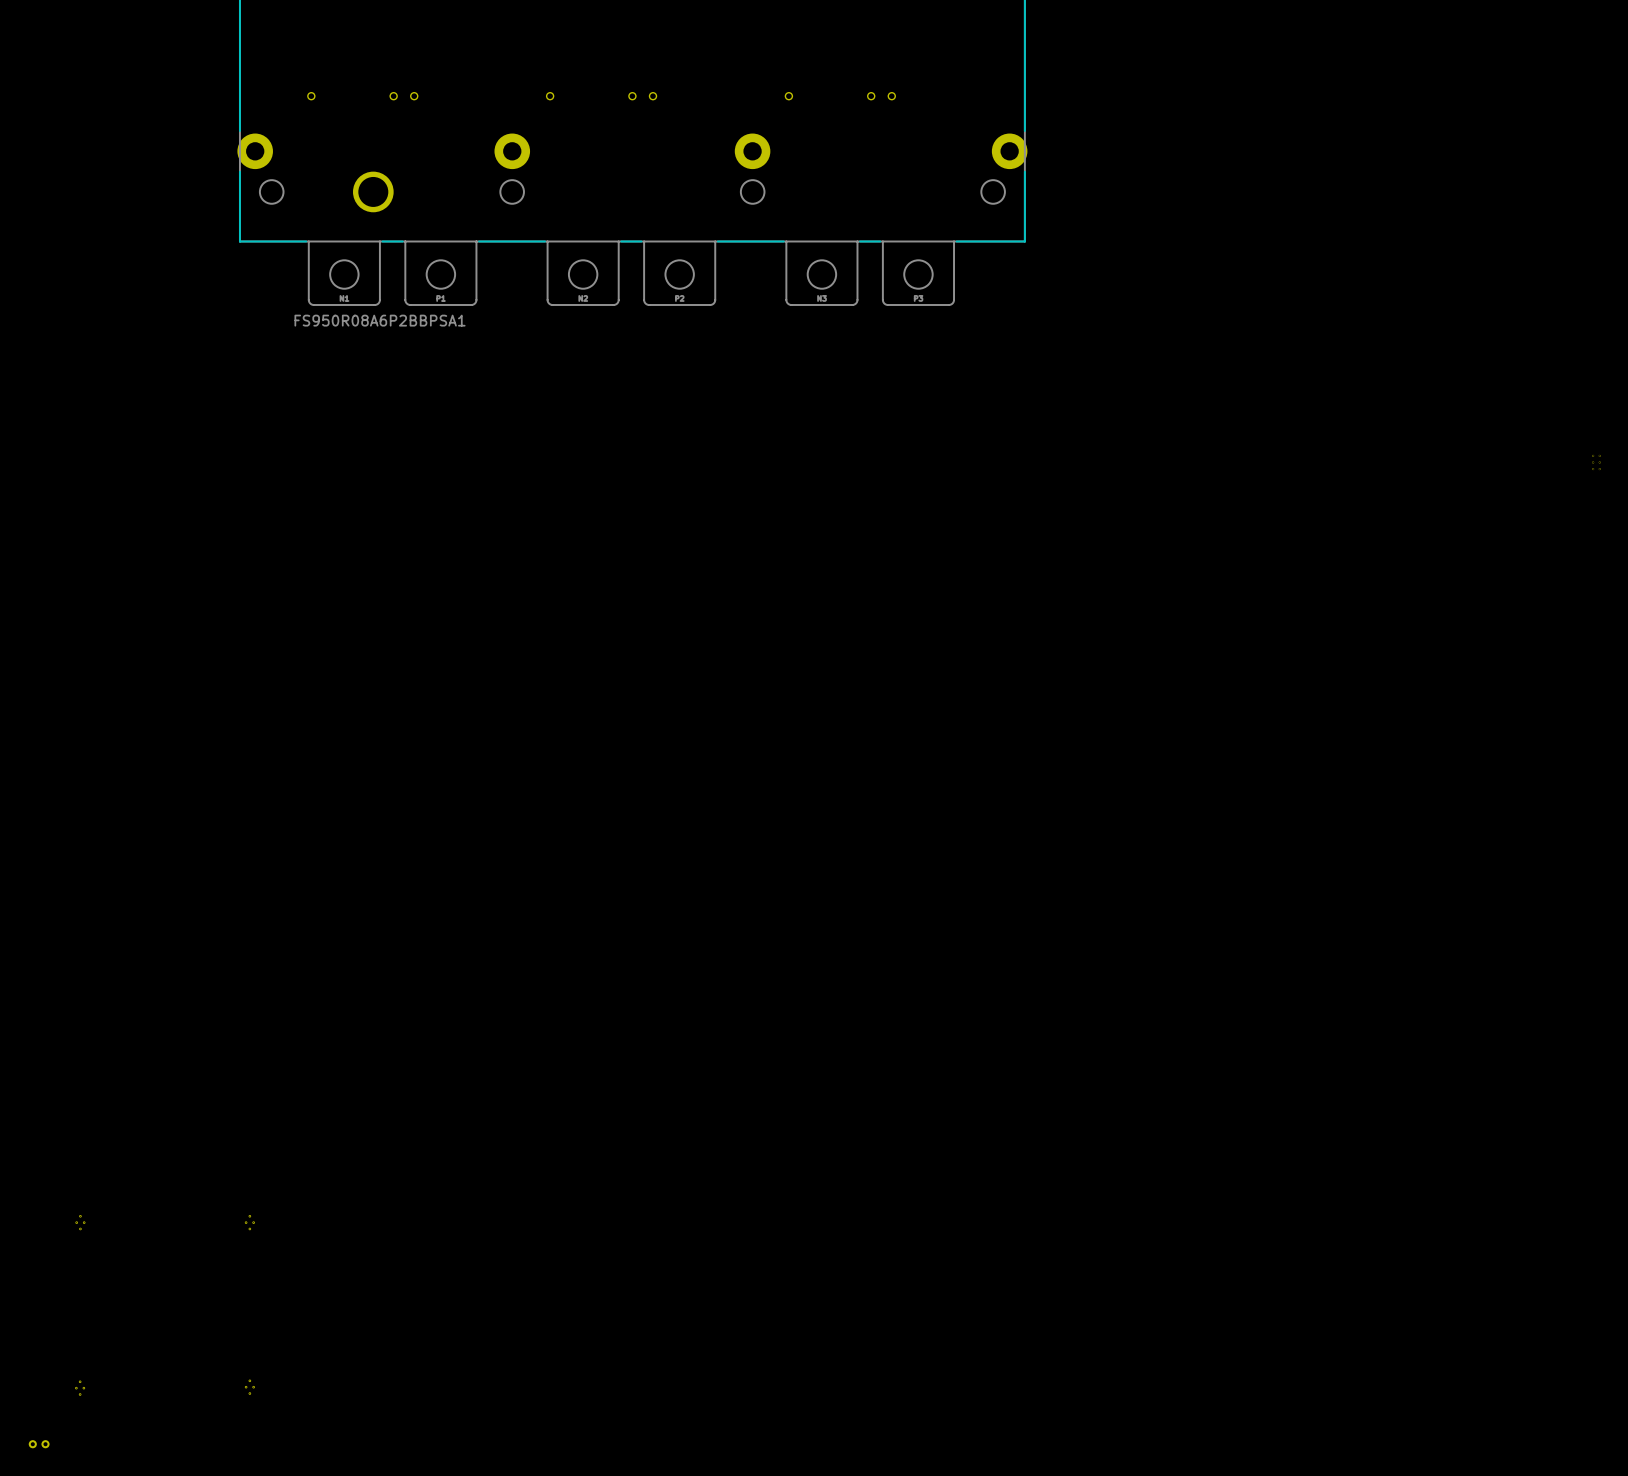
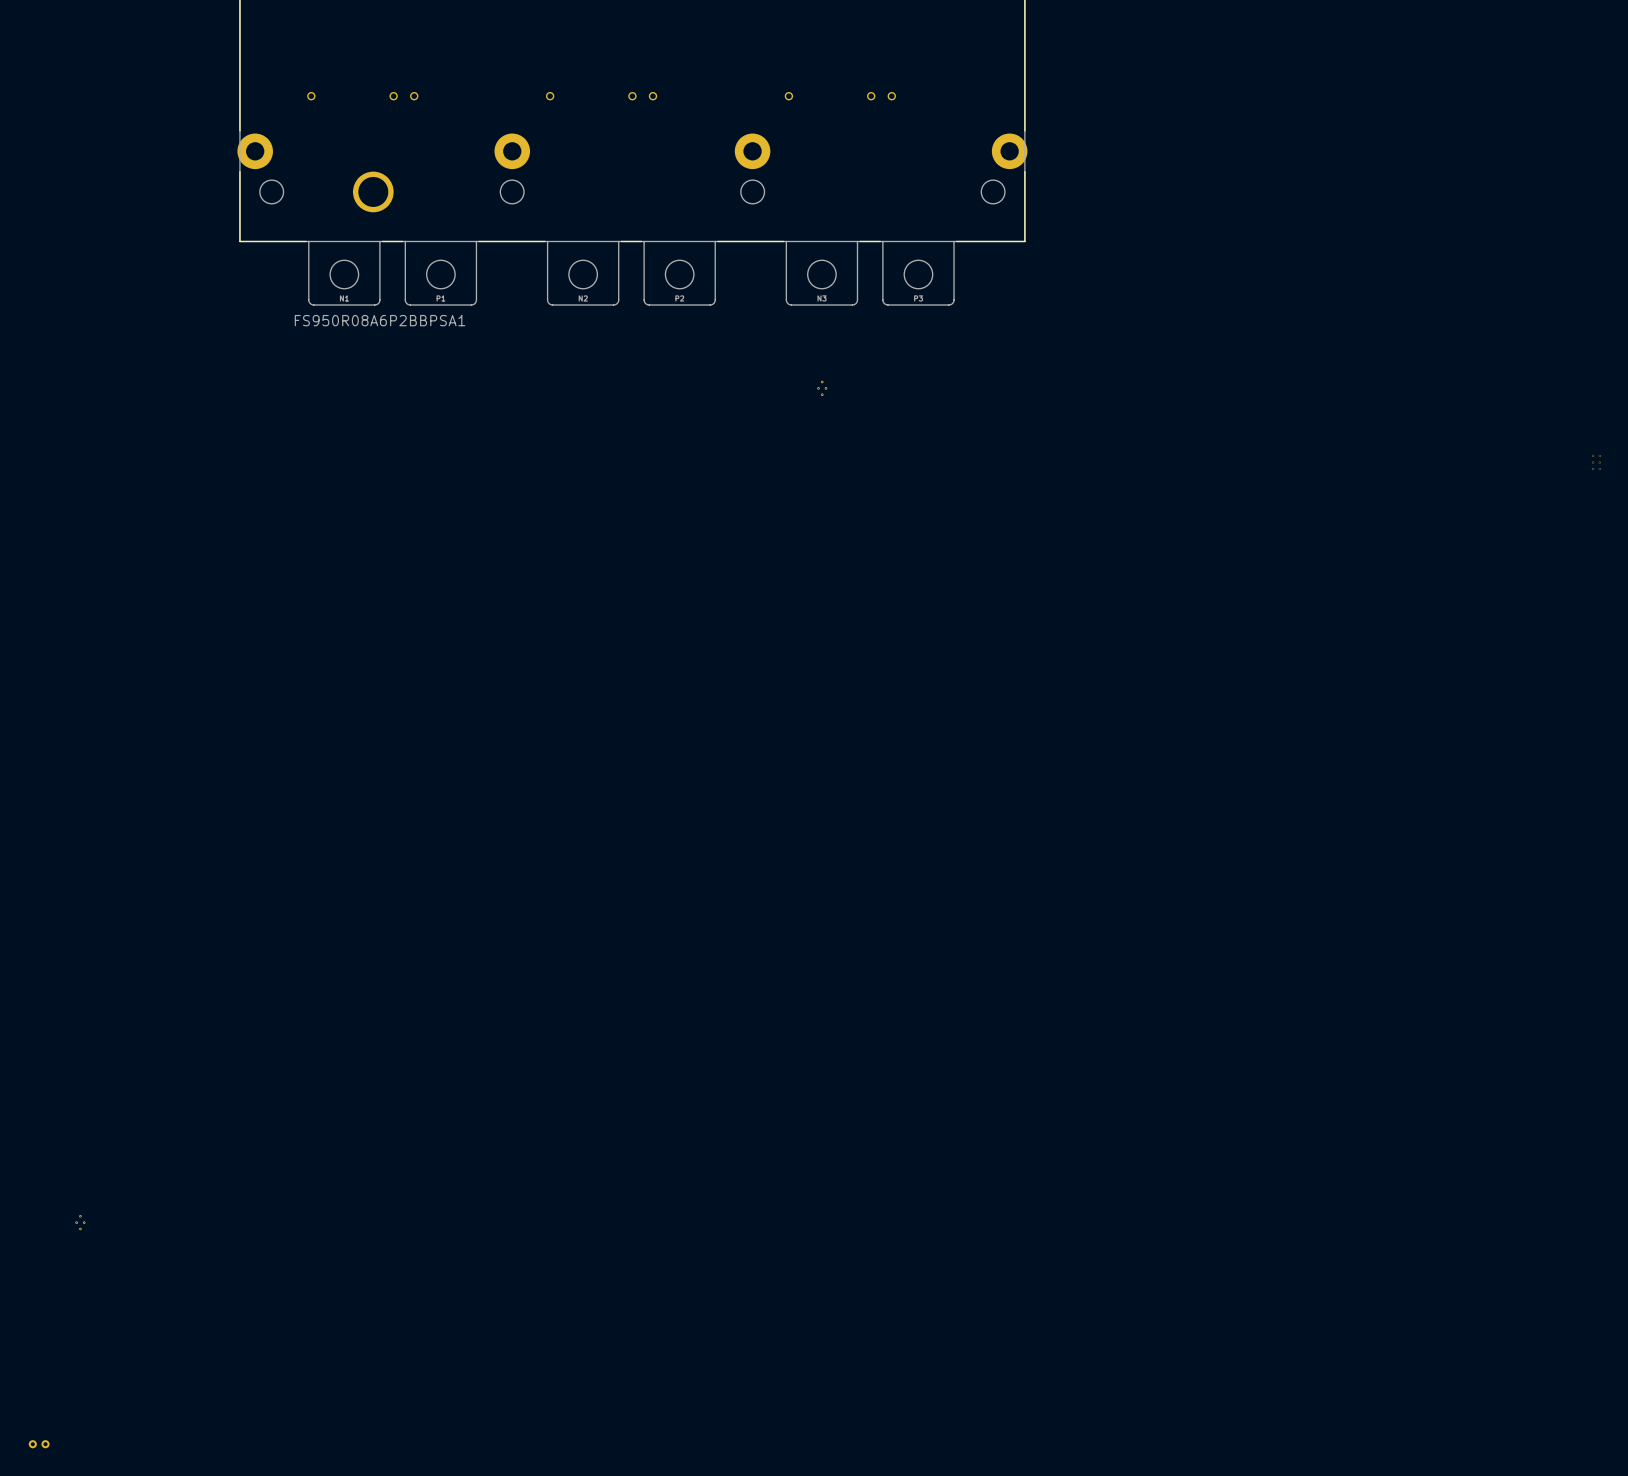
part: none -> (822, 388)
part: (249, 1222) -> none
part: (249, 1387) -> none
part: (80, 1388) -> none

